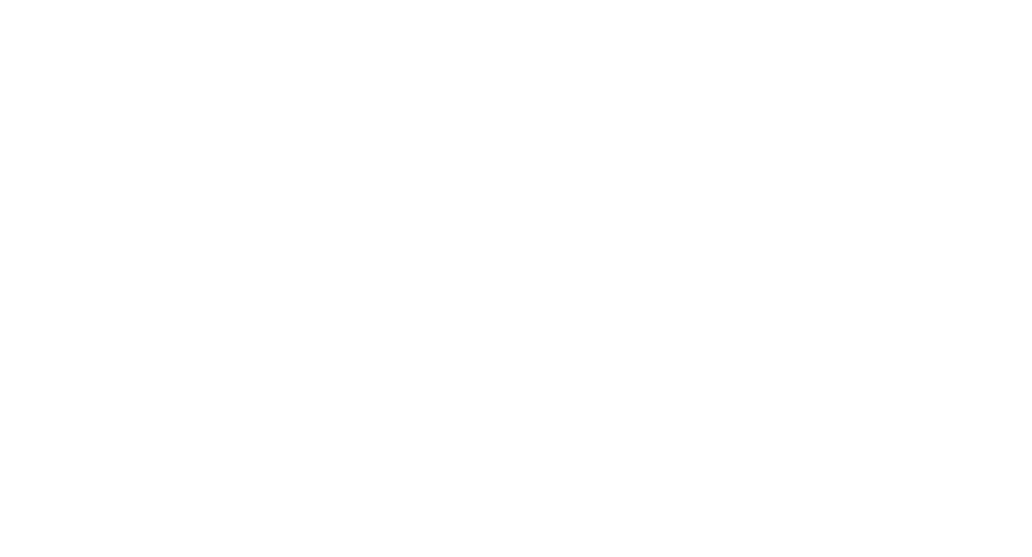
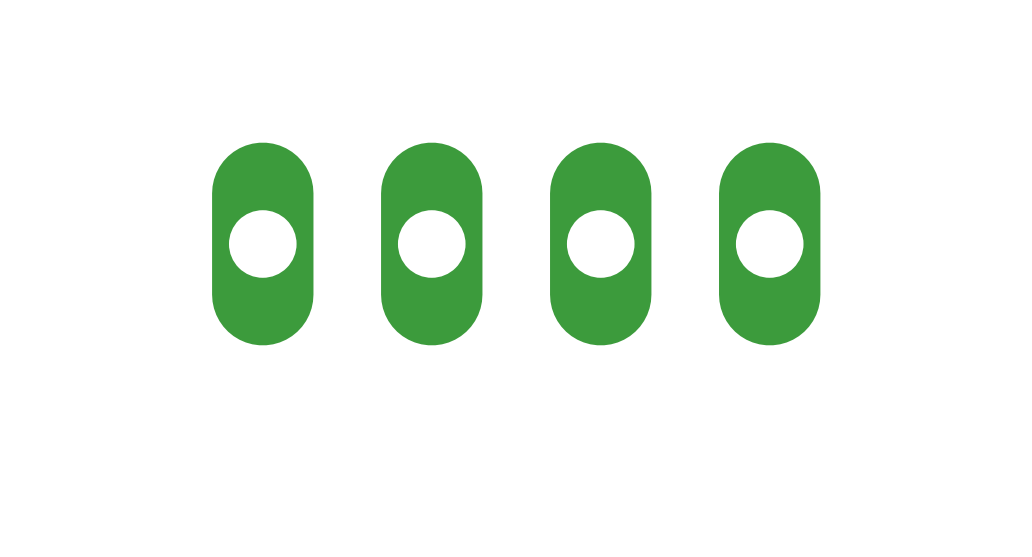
part: none -> (516, 243)

